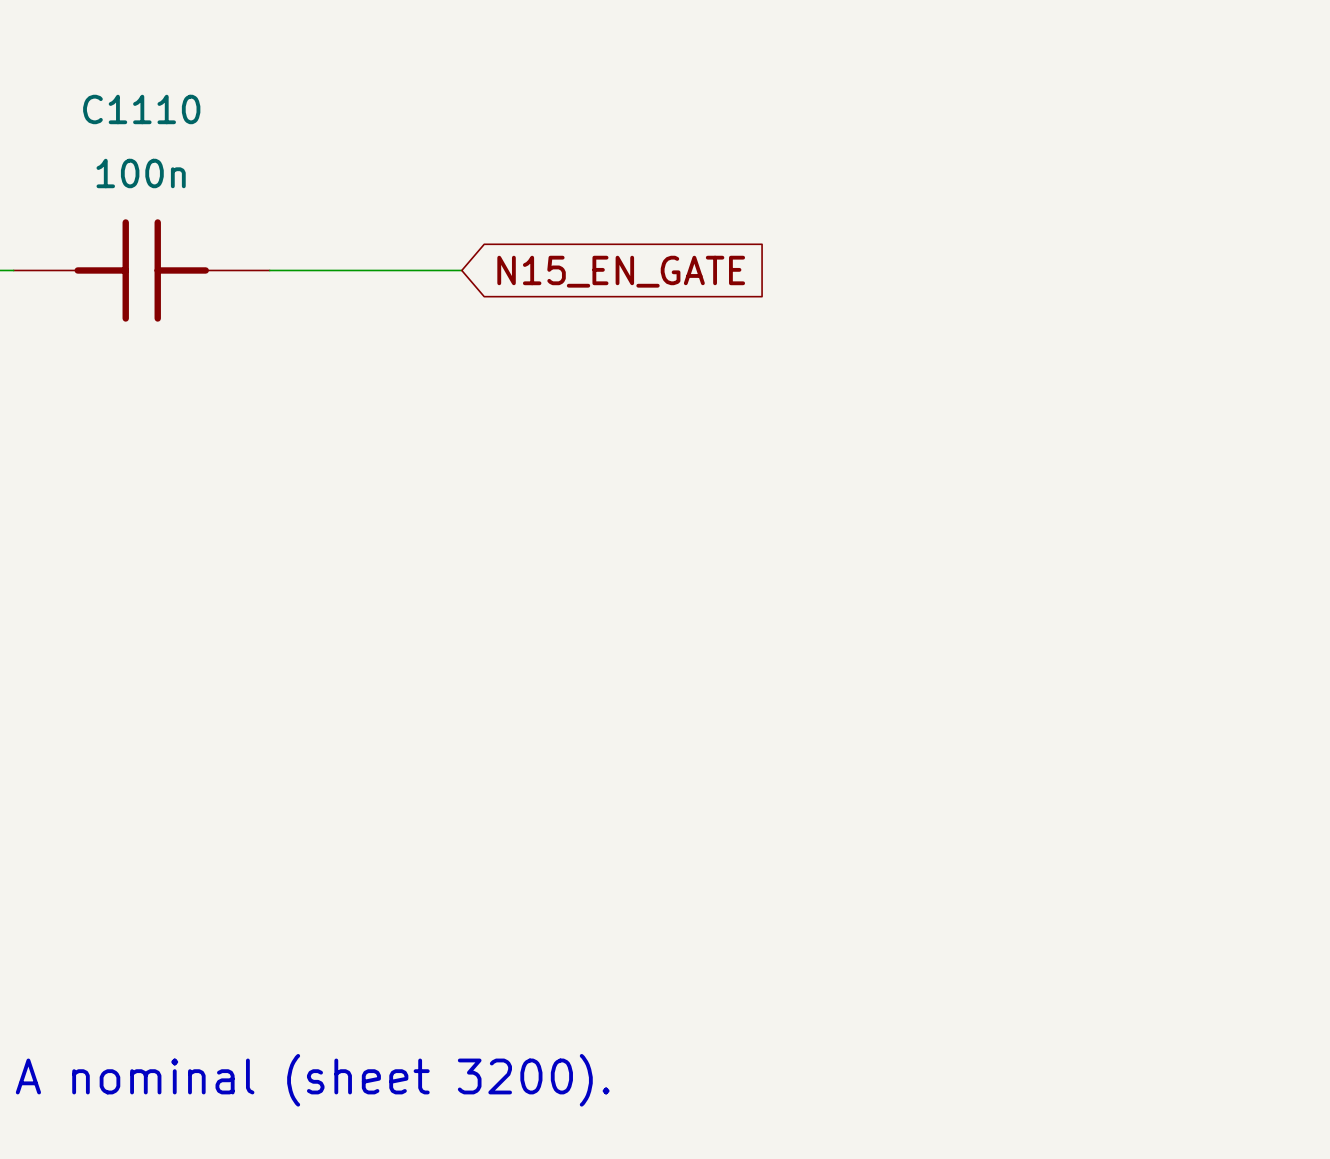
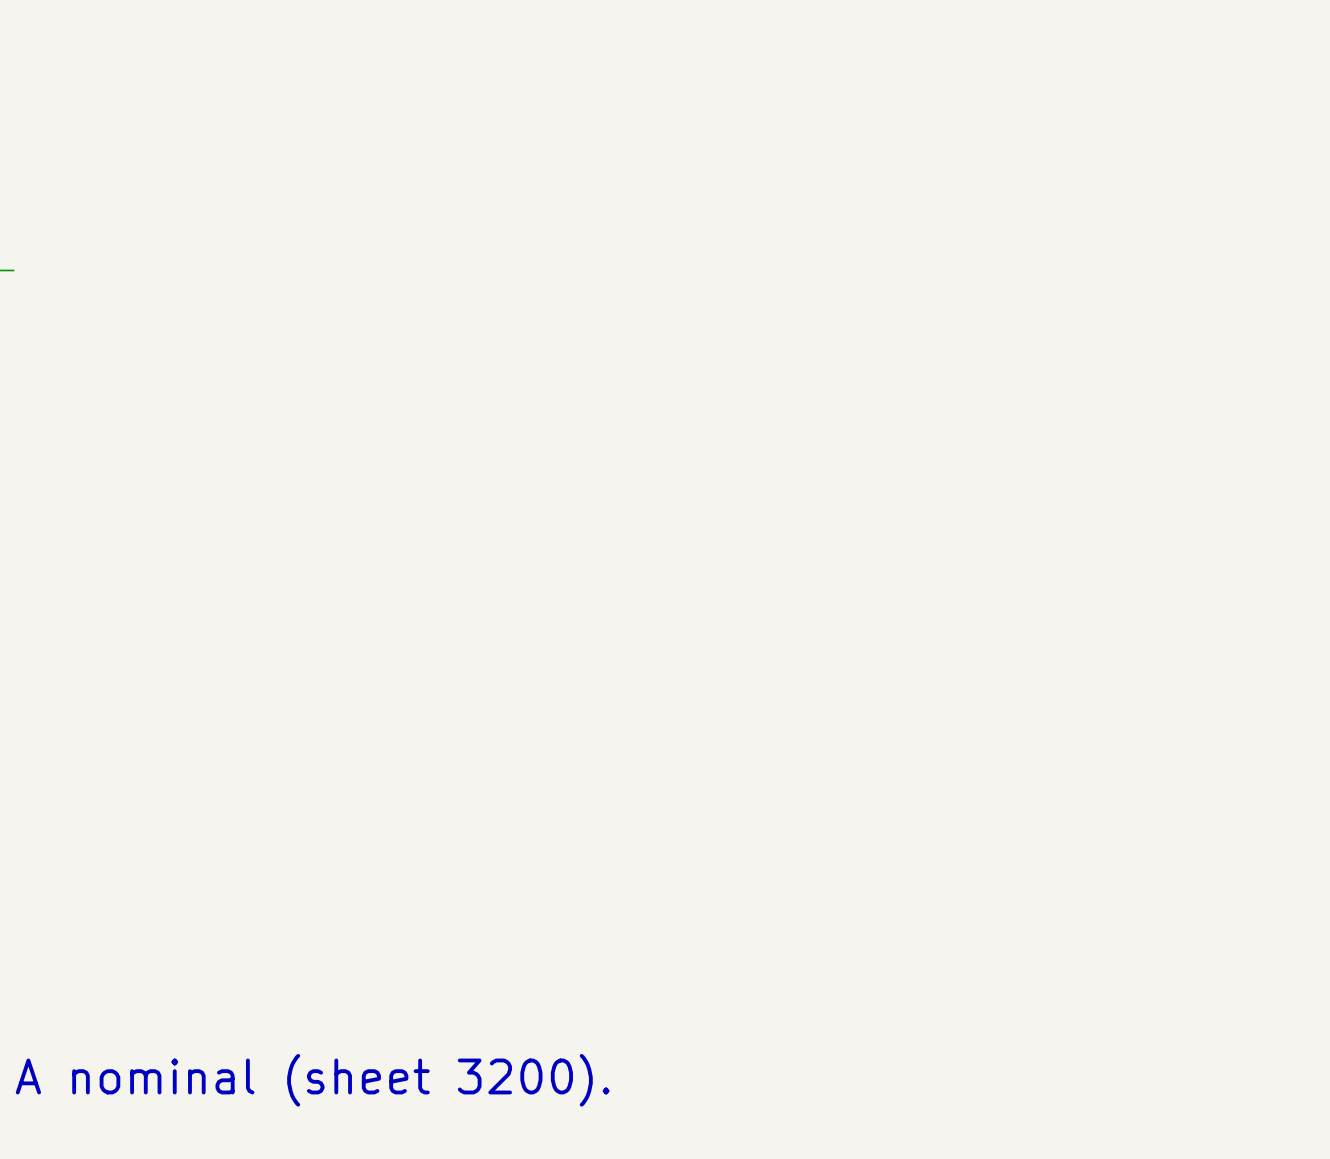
C1110: 100n (141, 270) -> none
wire: (269, 270) (461, 270) -> none
global label: N15_EN_GATE (621, 271) -> none

